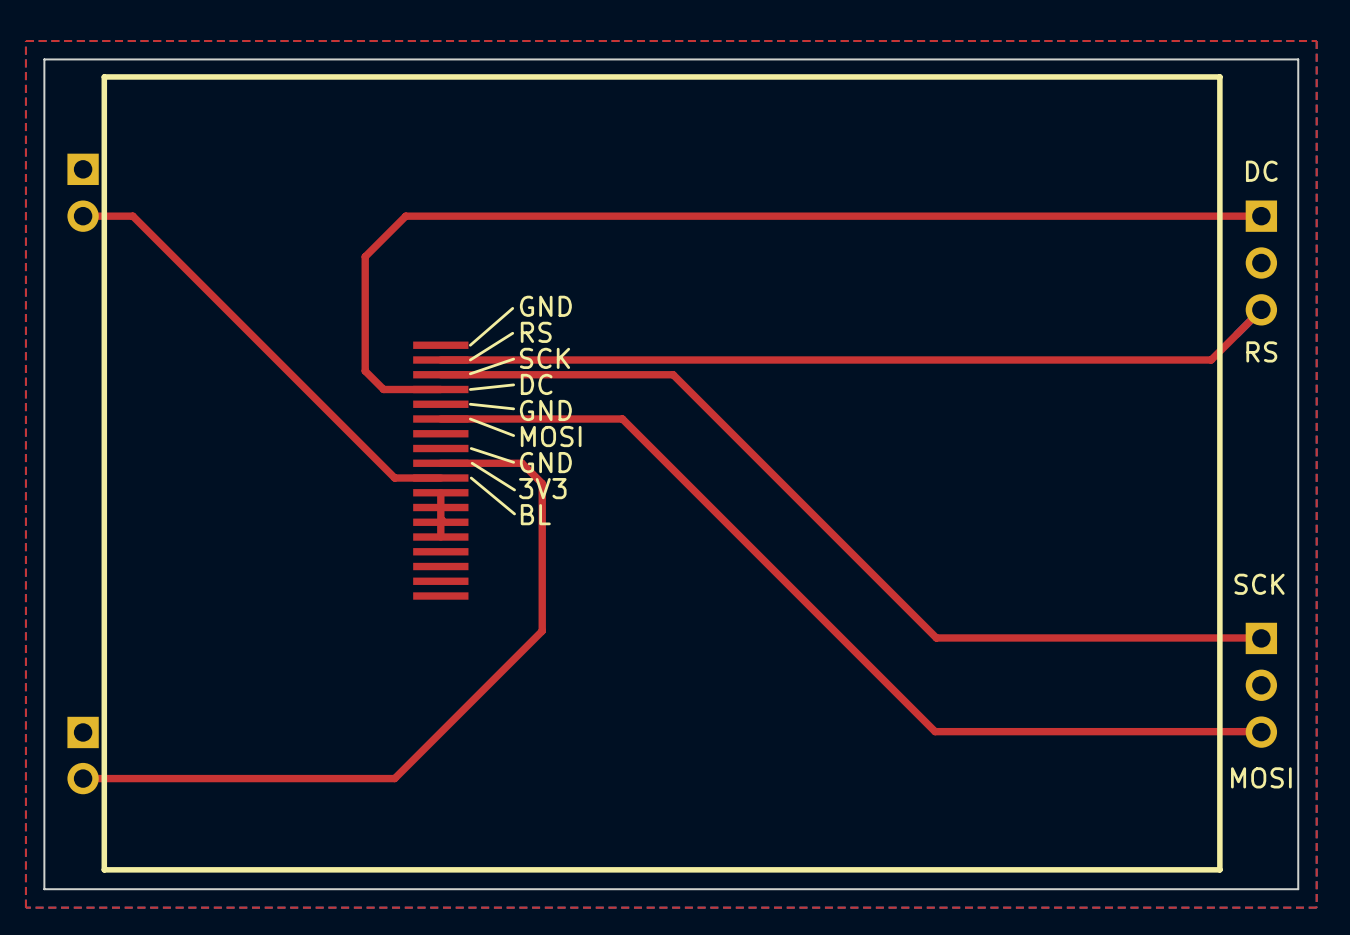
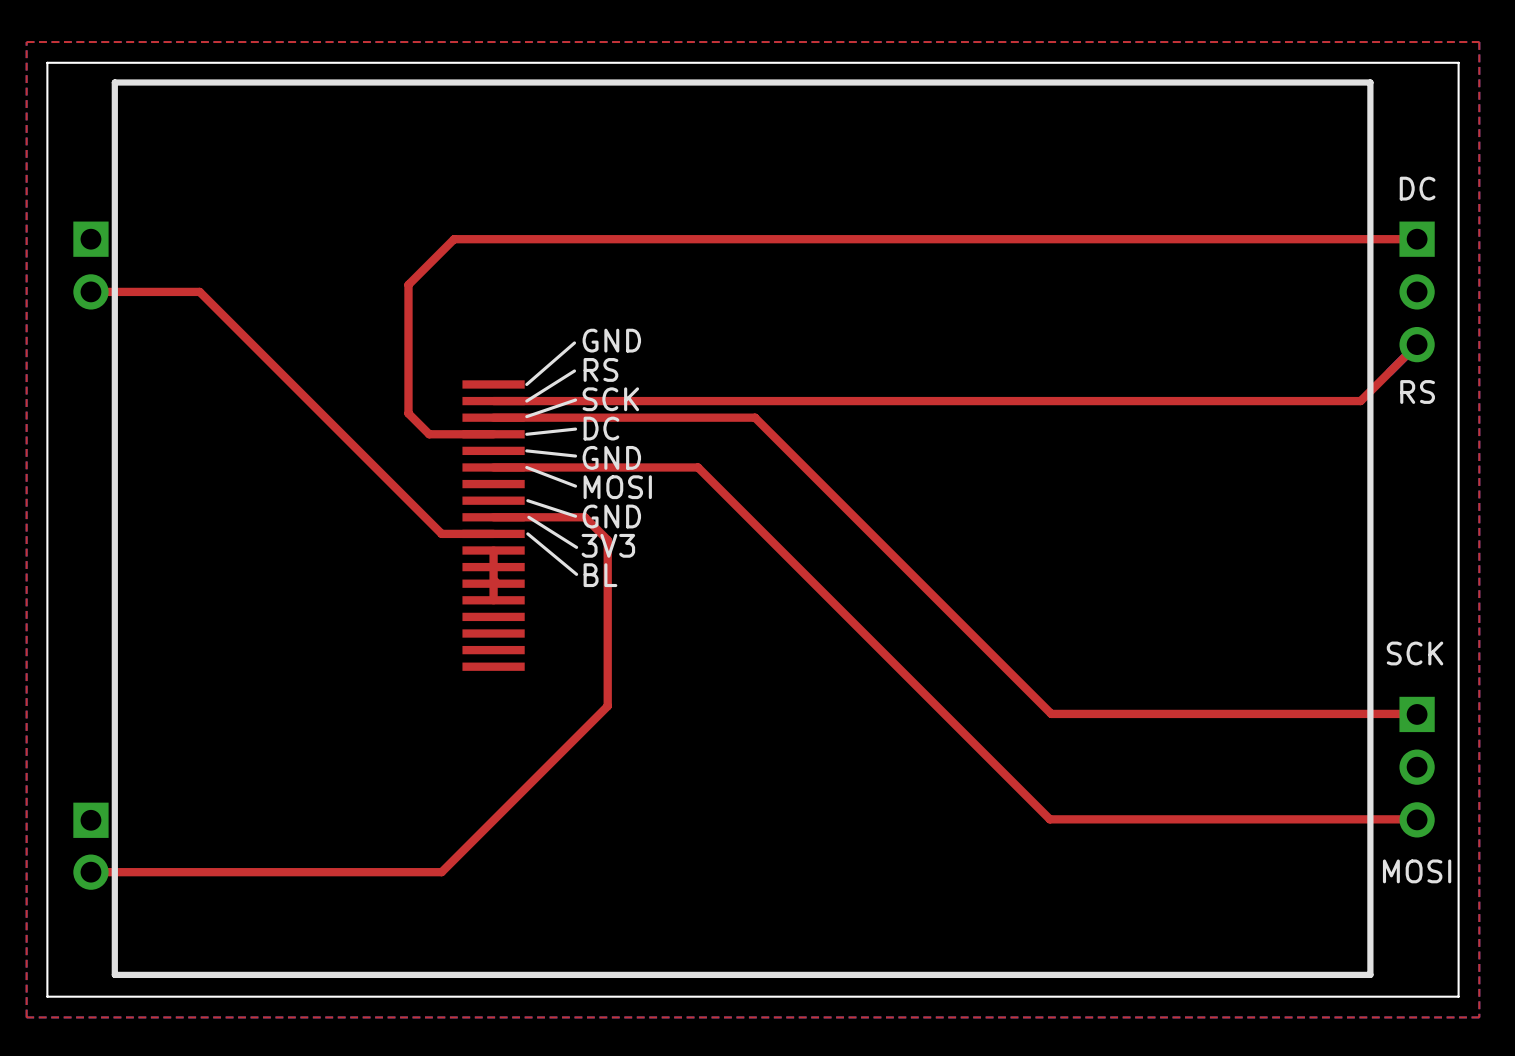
part position: (83, 192) -> (90, 265)
top track: (83, 216) (132, 216) (179, 263) -> (90, 291) (199, 291)

